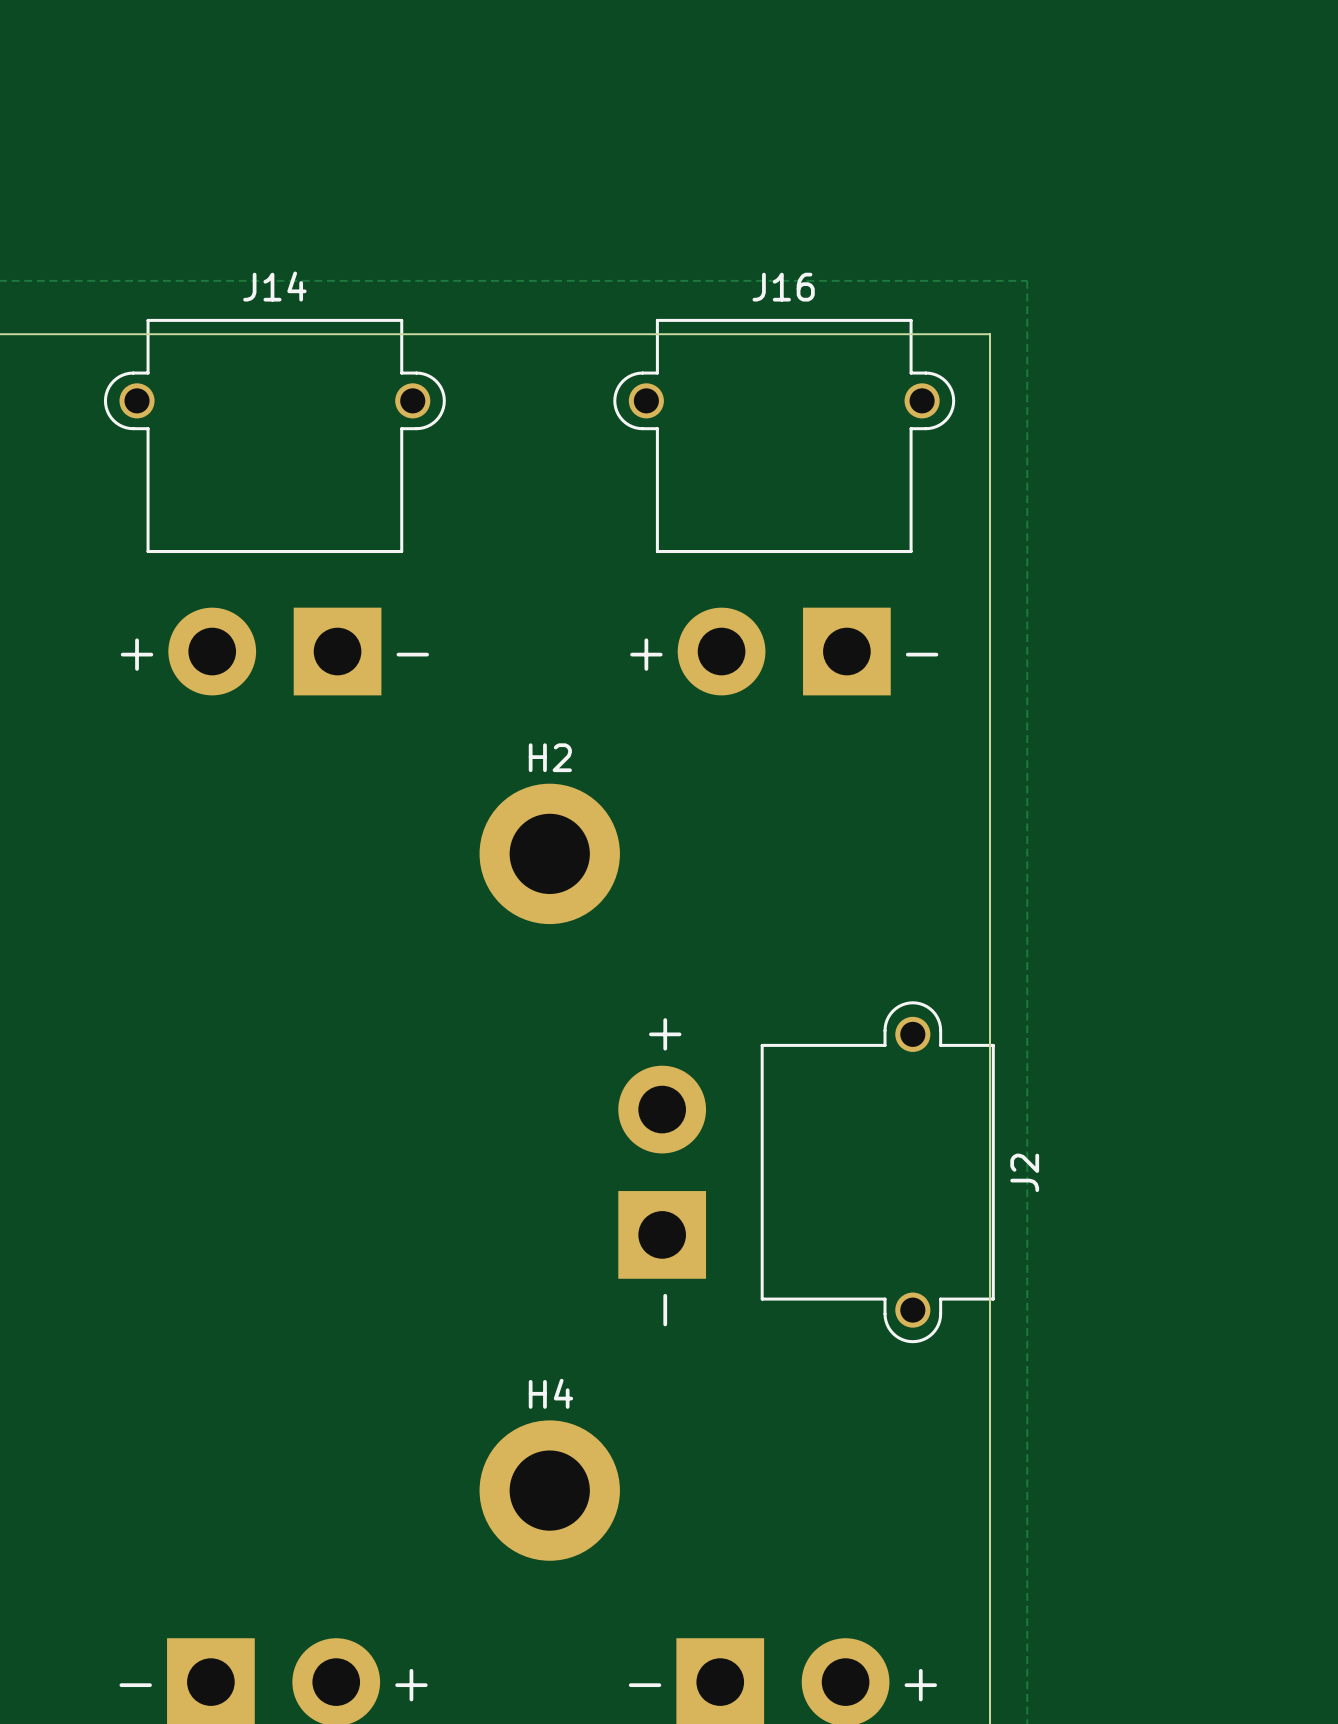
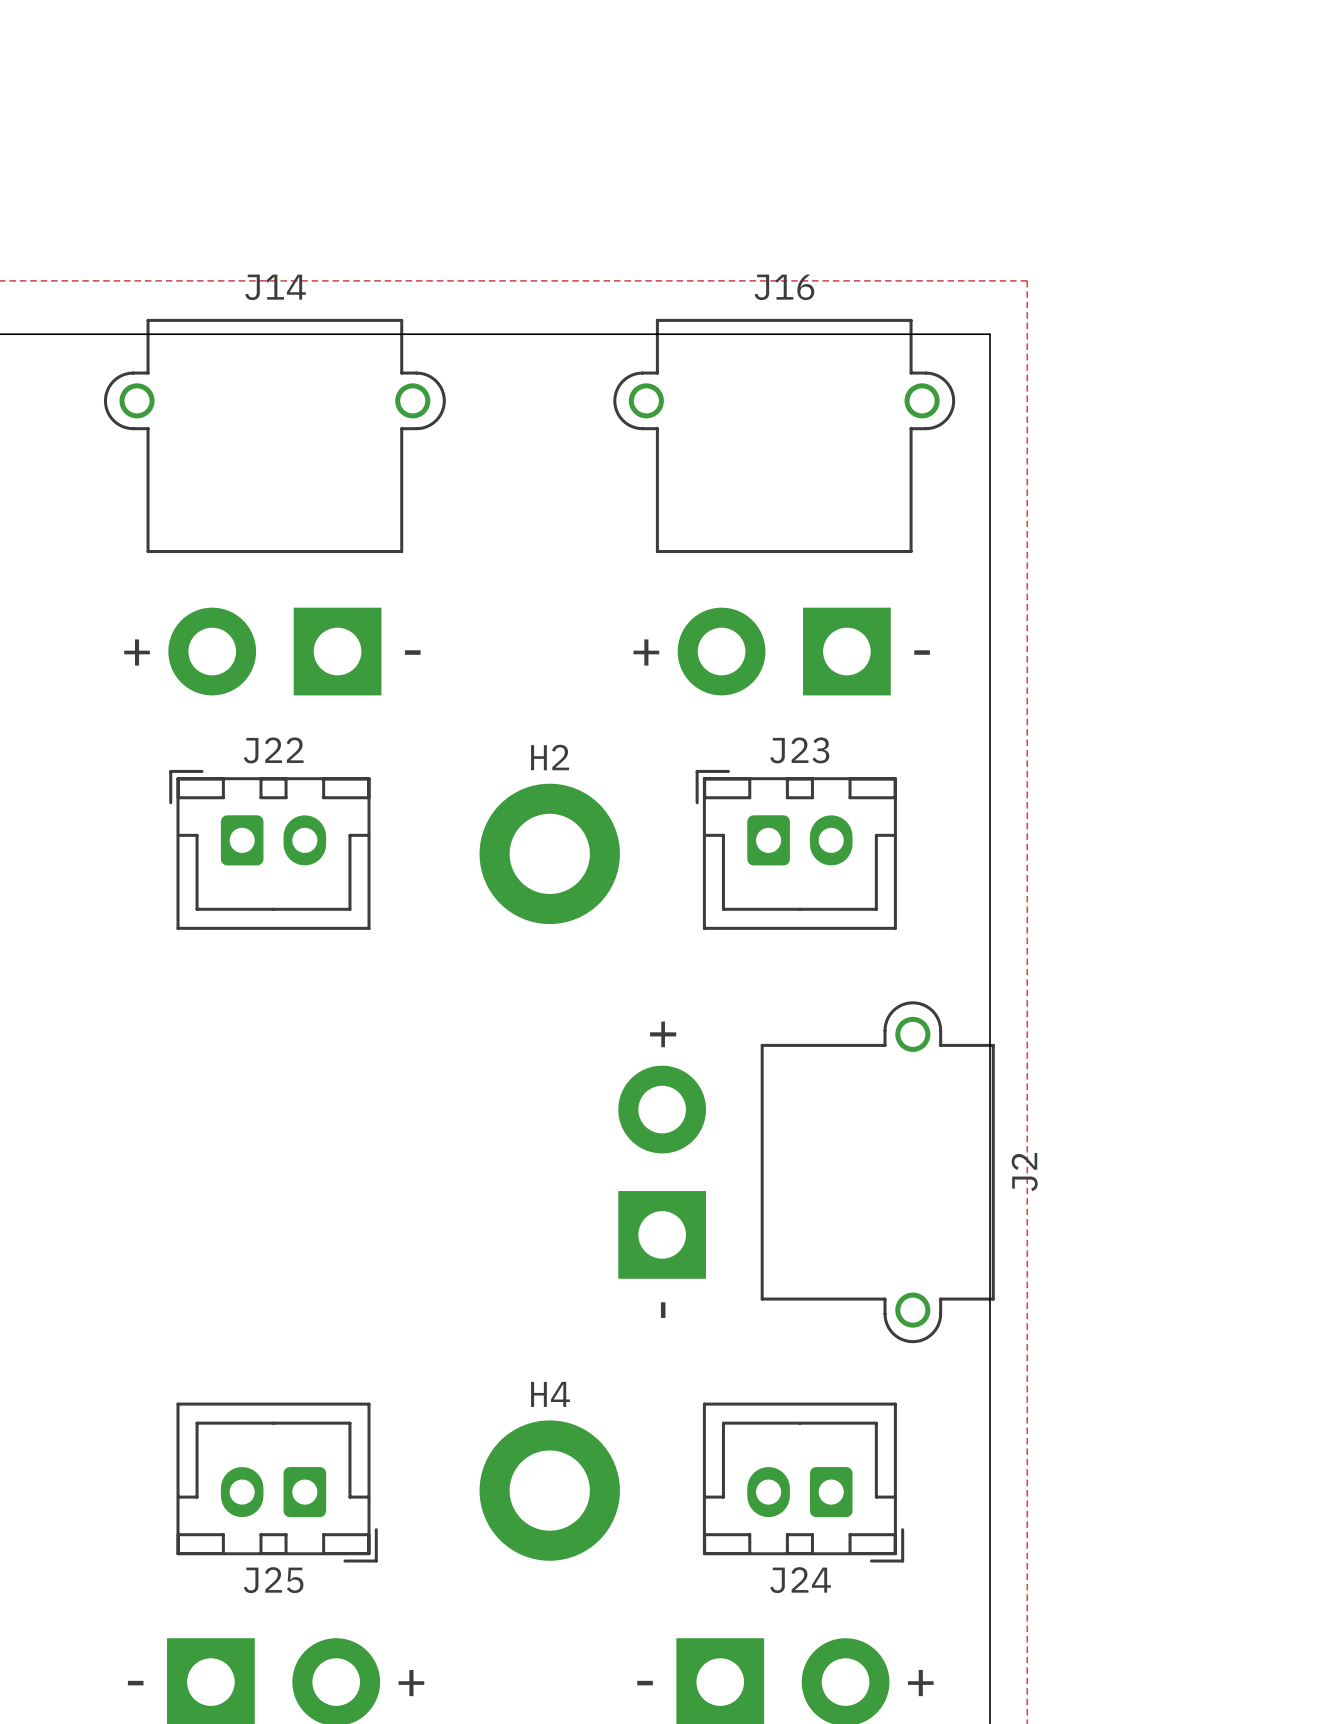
J22: none -> (269, 849)
J23: none -> (796, 849)
J25: none -> (277, 1482)
J24: none -> (803, 1482)

